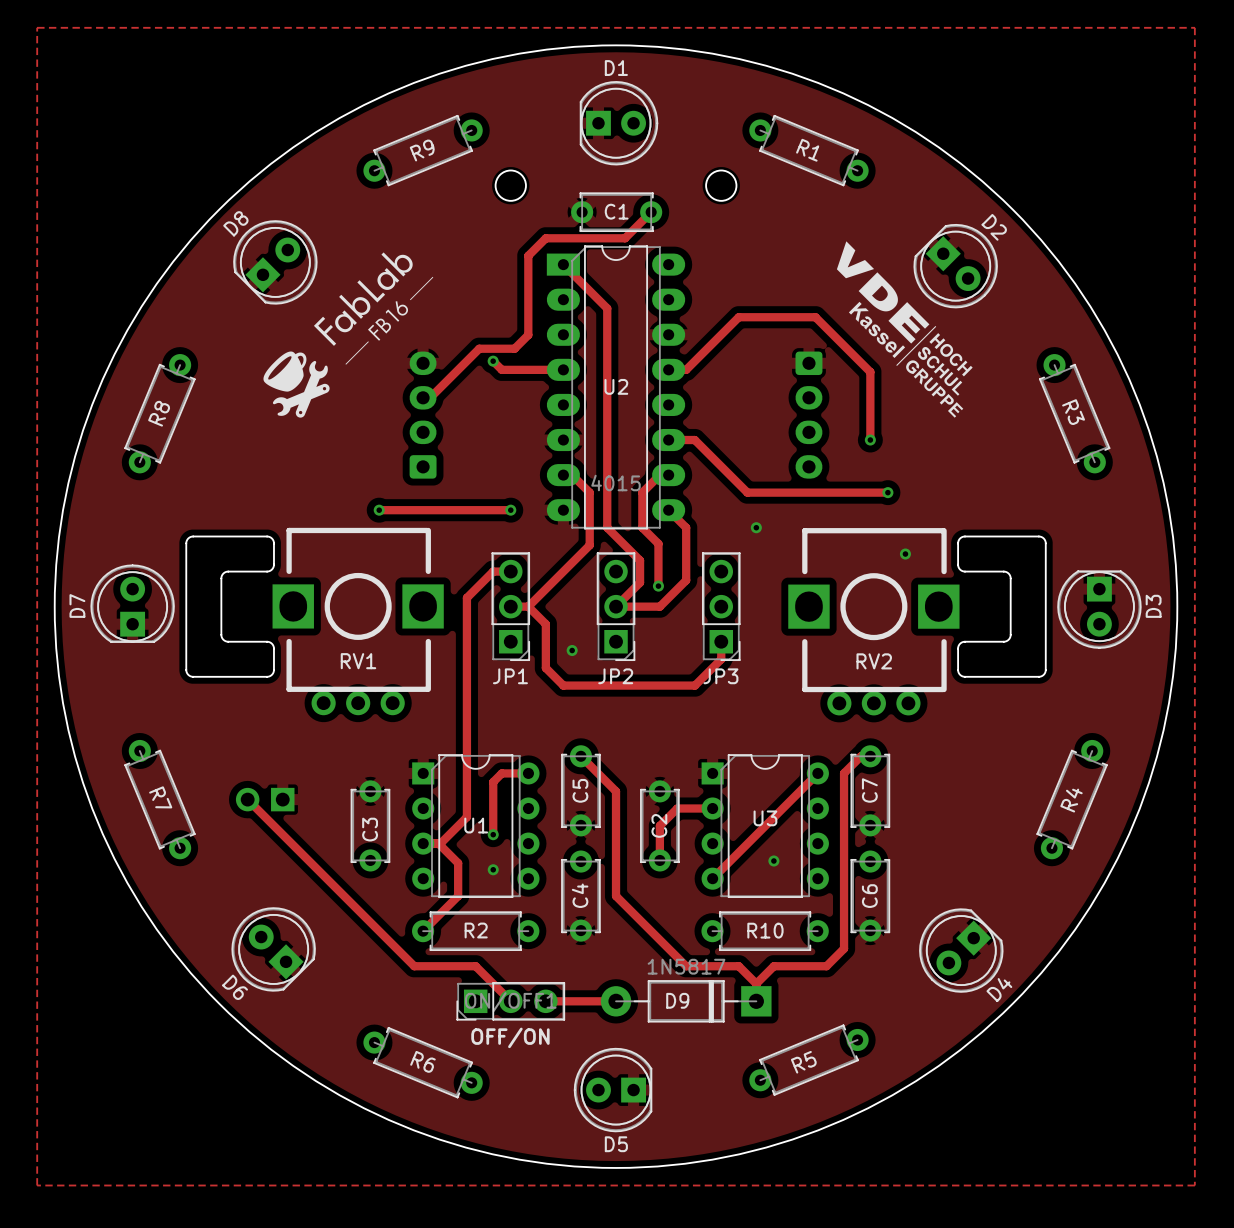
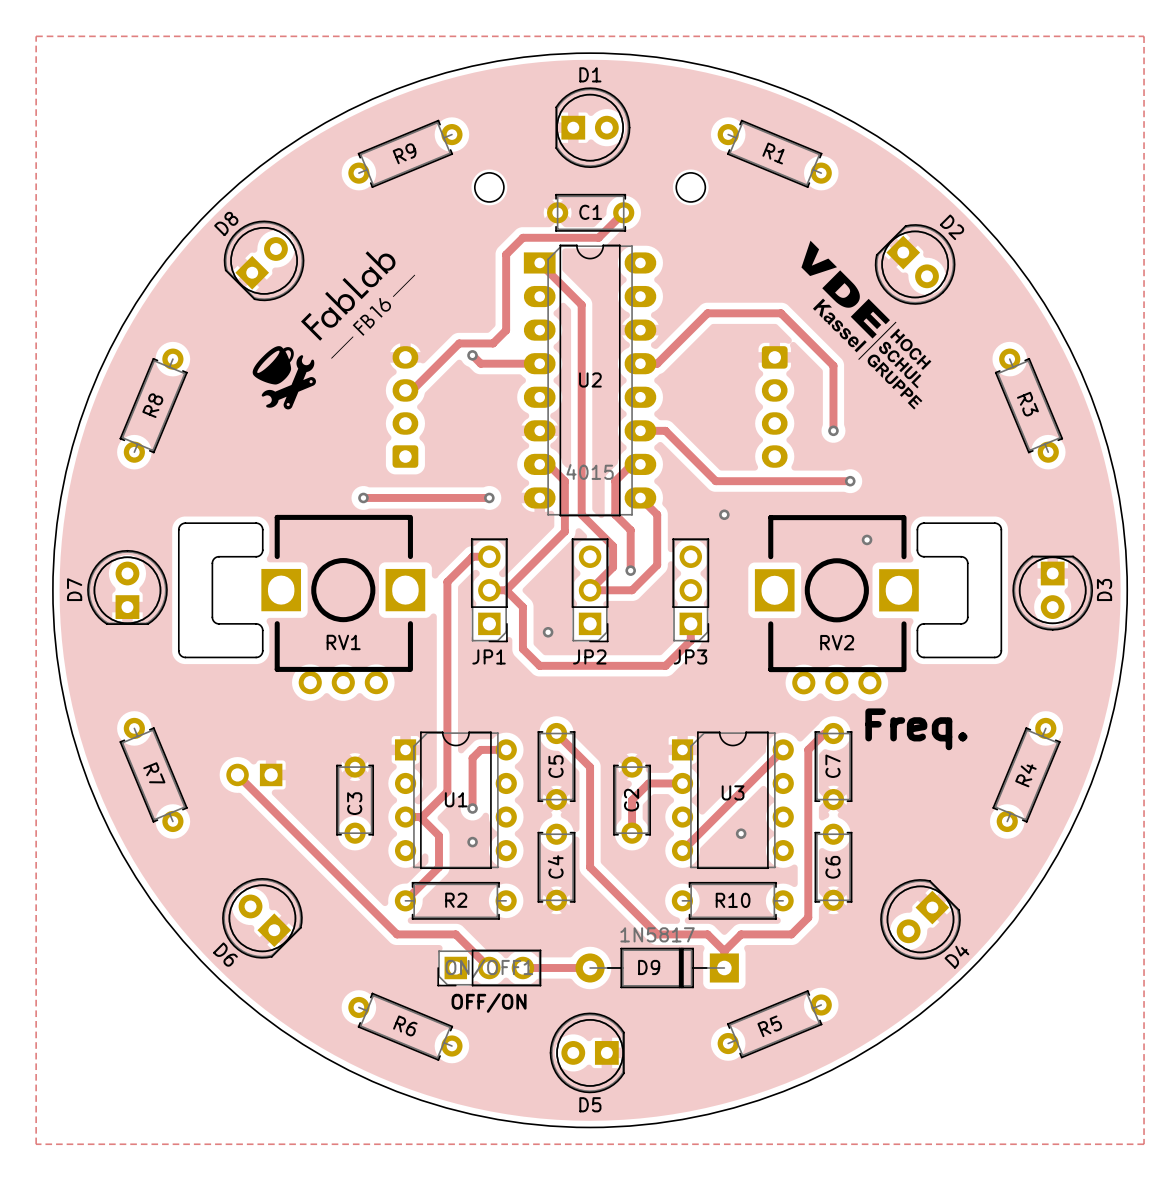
text: none -> Freq. (916, 729)

